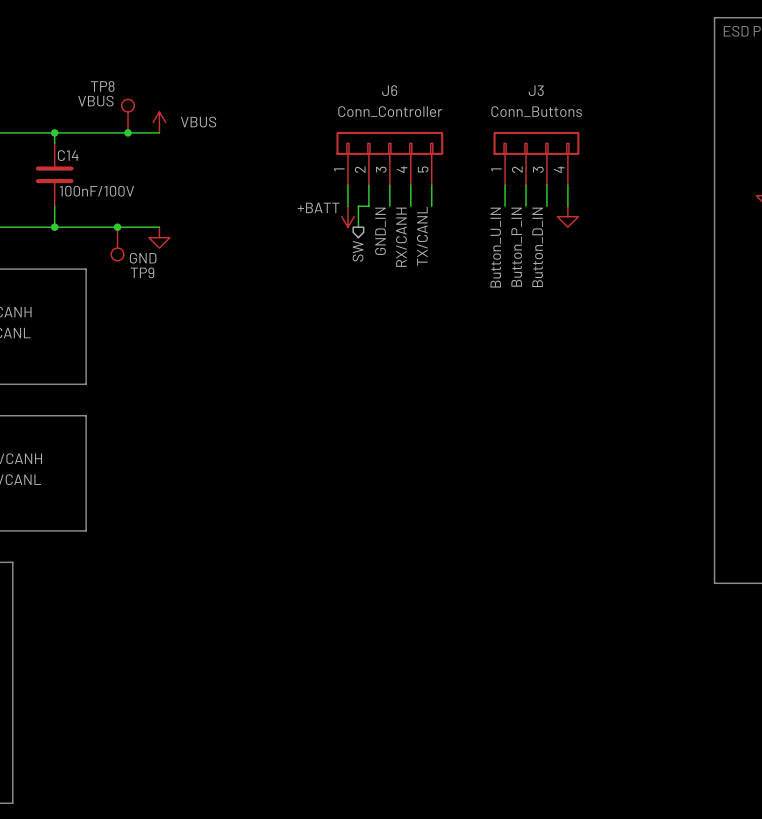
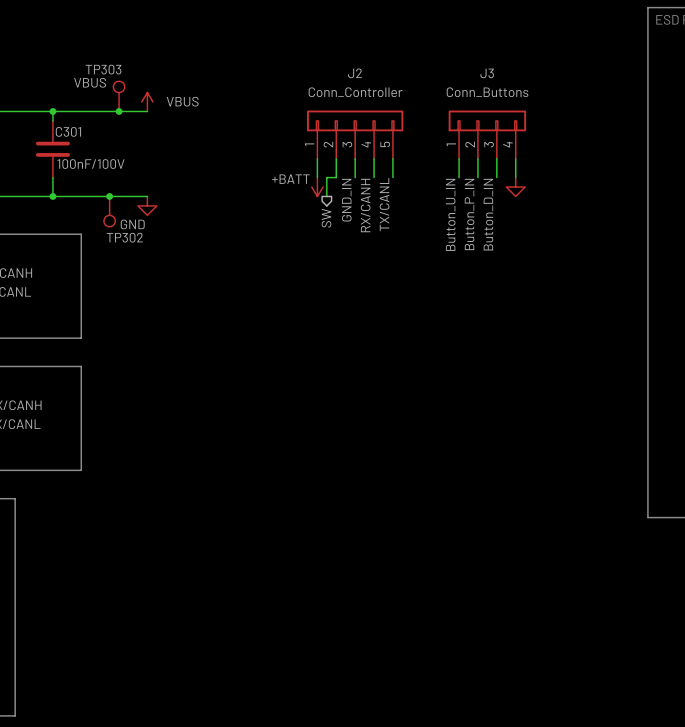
TP8 name: TP8 (102, 86) -> TP303 (103, 69)
J6 name: J6 (389, 90) -> J2 (354, 73)
C14 name: C14 (68, 155) -> C301 (68, 131)
TP9 name: TP9 (142, 272) -> TP302 (124, 237)

